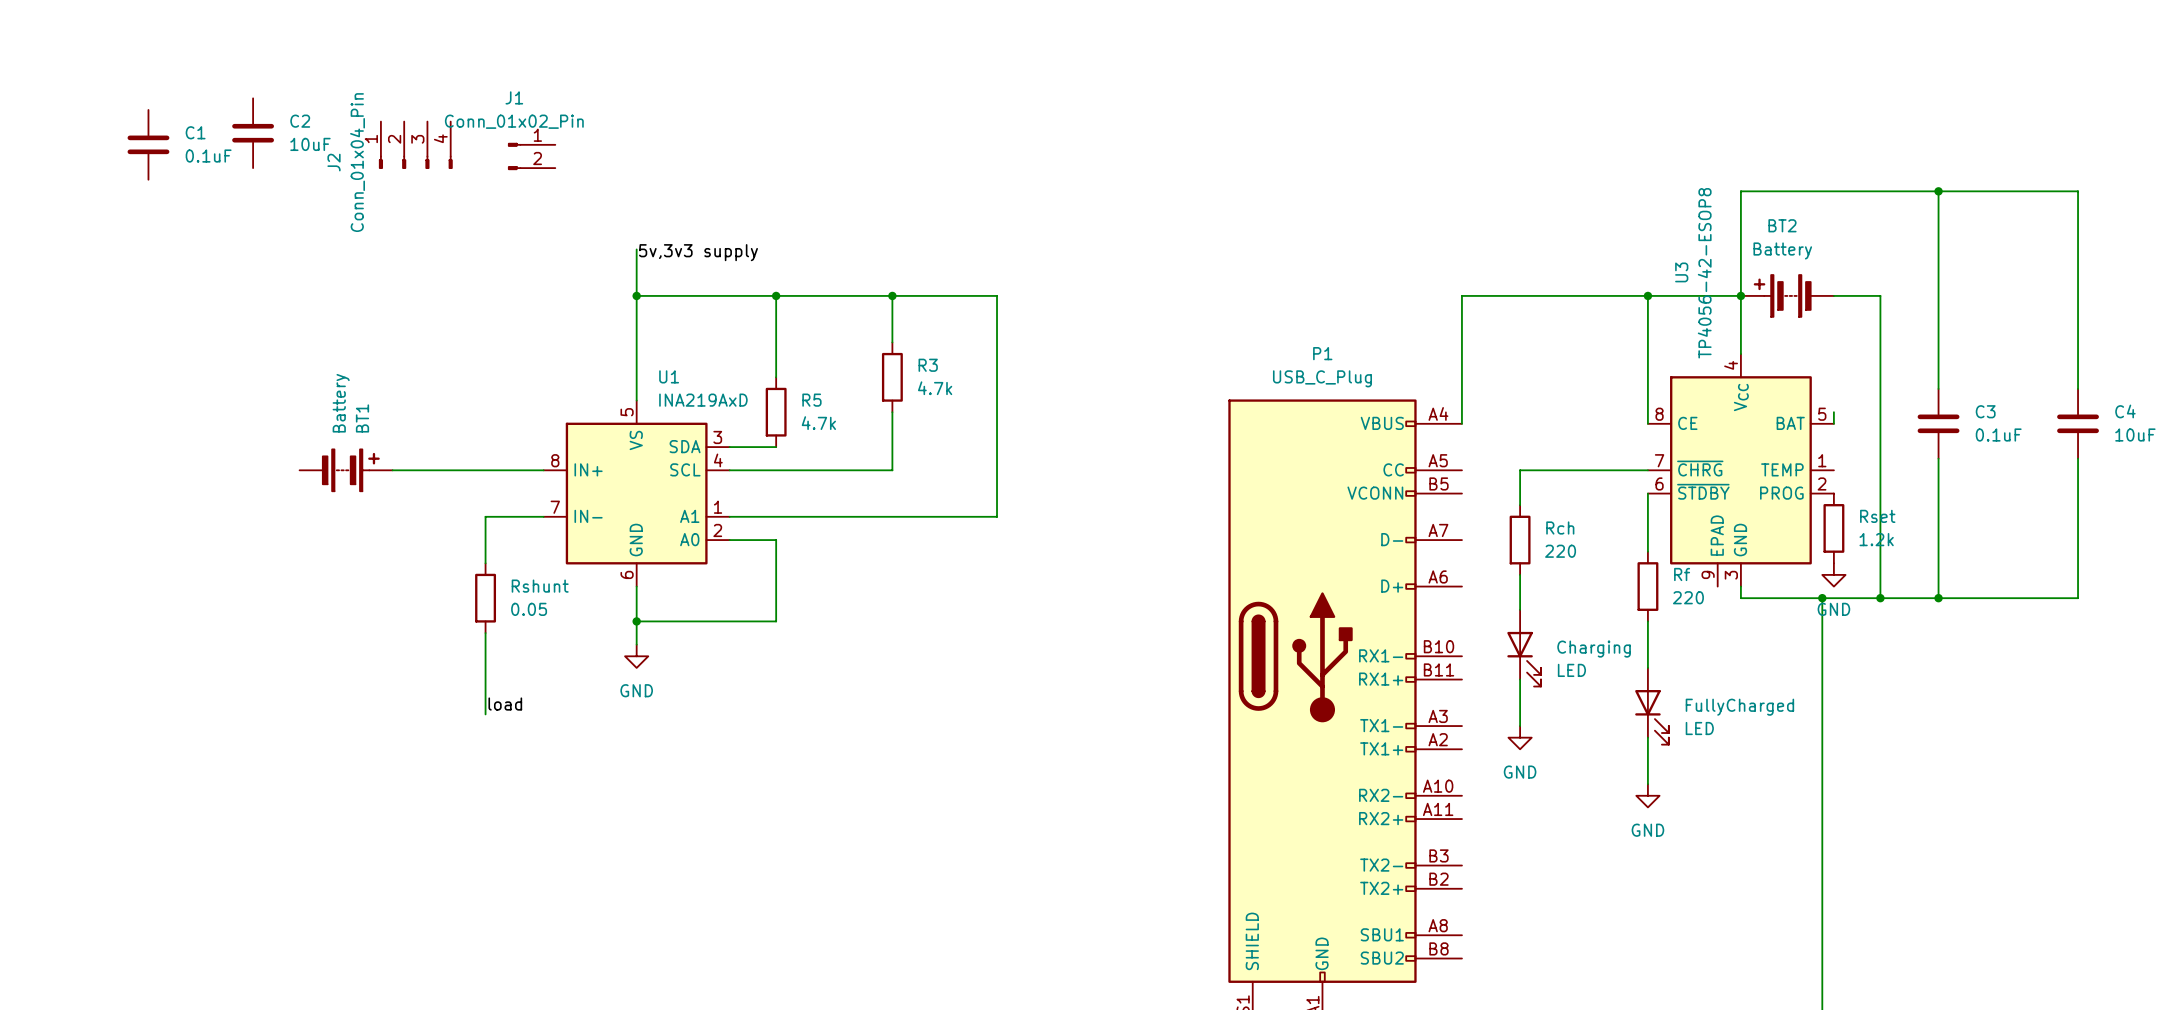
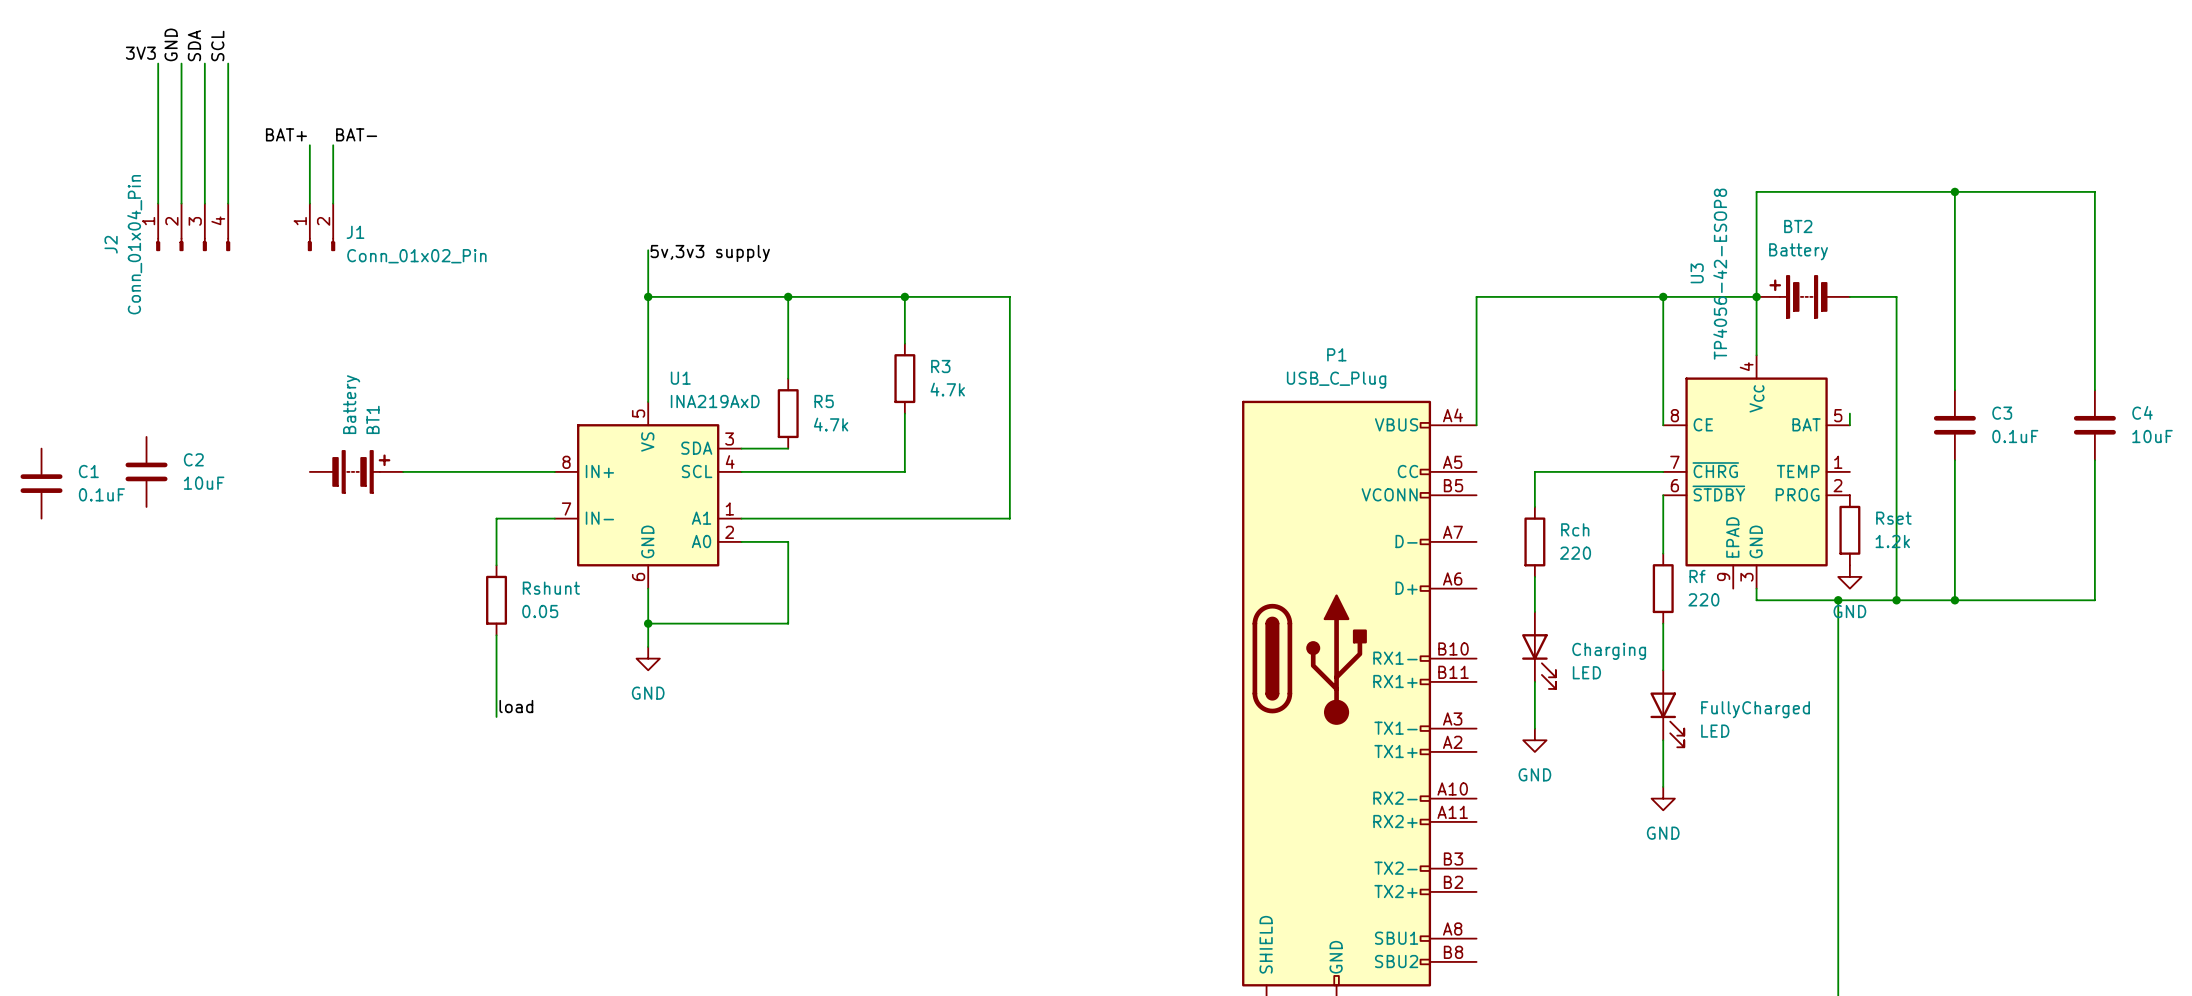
label: none -> GND (171, 44)
label: none -> SDA (194, 45)
label: none -> SCL (217, 46)
label: none -> 3V3 (140, 53)
wire: none -> (158, 63) (158, 203)
wire: none -> (181, 63) (181, 203)
wire: none -> (204, 63) (204, 203)
wire: none -> (228, 63) (228, 203)
J1 name position: J1 (514, 97) -> J1 (355, 232)
J1 value position: Conn_01x02_Pin (514, 121) -> Conn_01x02_Pin (416, 256)
C2 position: (253, 133) -> (146, 471)
label: none -> BAT+ (286, 134)
label: none -> BAT- (356, 134)
C1 position: (148, 144) -> (41, 483)
wire: none -> (309, 145) (309, 203)
wire: none -> (333, 145) (333, 203)
J2 position: (415, 145) -> (193, 227)
J1 rotation: 0° (514, 156) -> 90° counterclockwise (321, 244)
J1 position: (531, 156) -> (321, 227)

